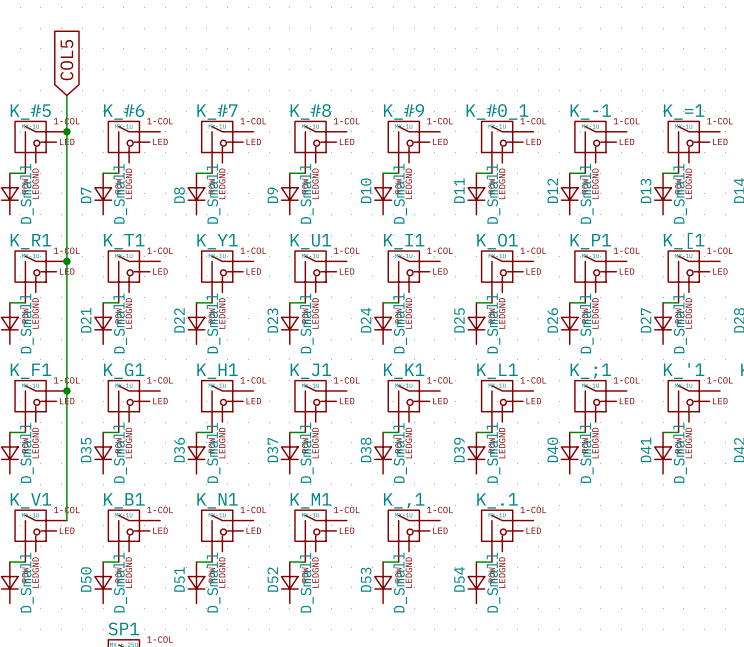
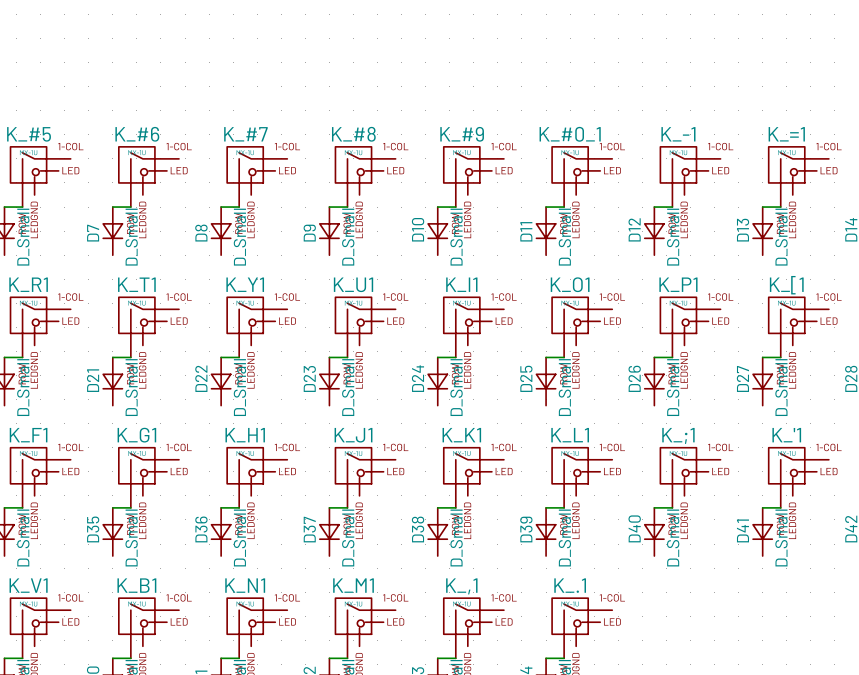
global label: COL5 (66, 60) -> none
wire: (66, 95) (66, 520) -> none
junction: (66, 131) -> none
junction: (66, 261) -> none
junction: (66, 390) -> none

